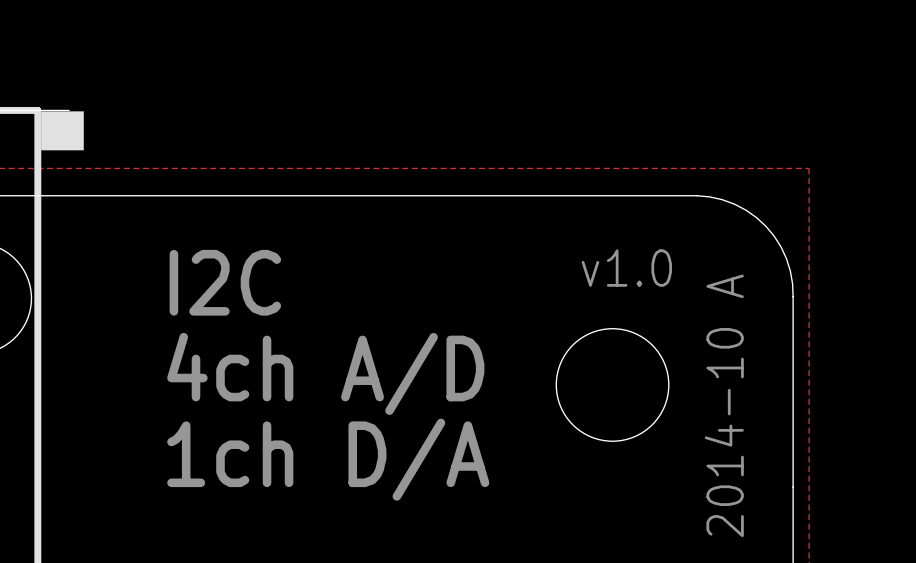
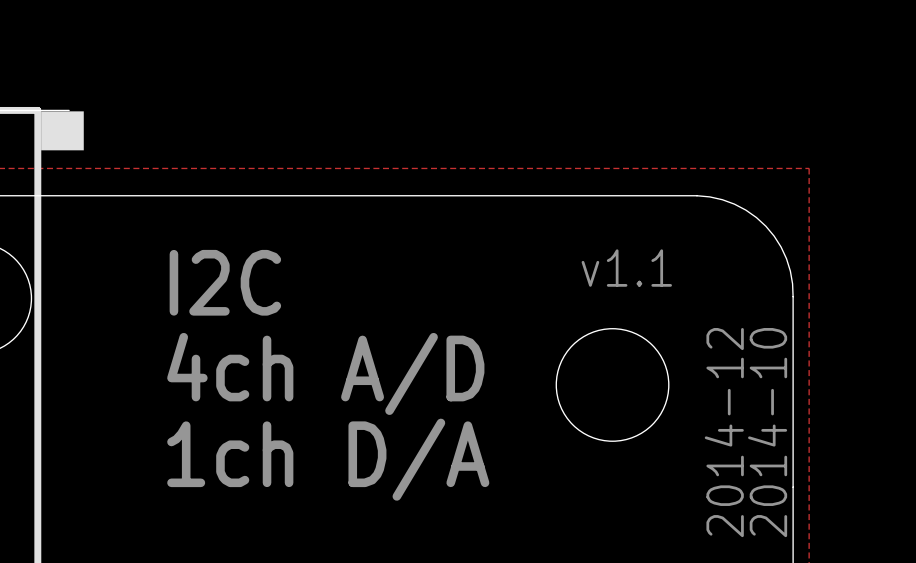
text: v1.0 (626, 268) -> v1.1 (626, 268)
text: 2014-10 A (724, 405) -> 2014-12 (724, 432)
text: none -> 2014-10 (767, 432)

